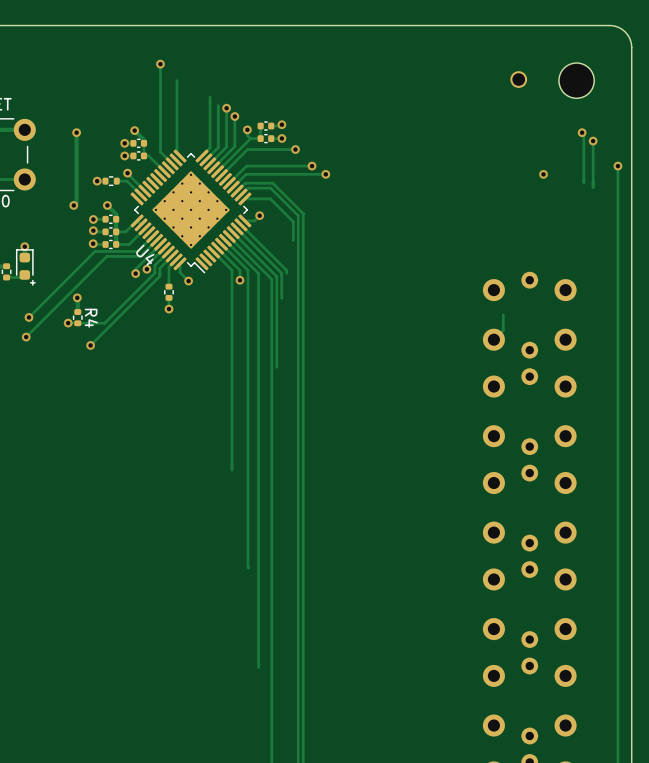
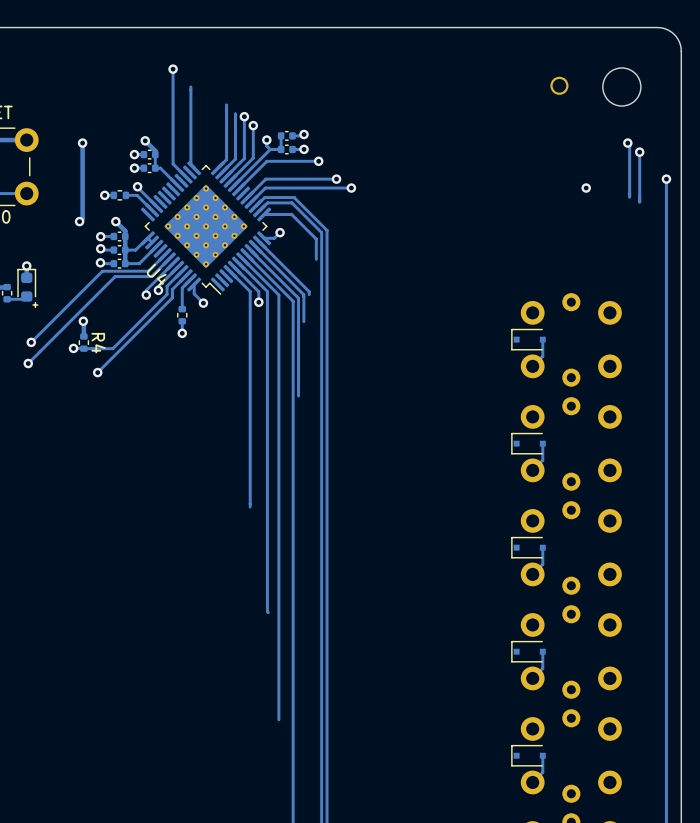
part: none -> (528, 339)
part: none -> (528, 443)
track: none -> (542, 443) (542, 460) (532, 470)
part: none -> (528, 547)
track: none -> (542, 547) (542, 564) (532, 574)
part: none -> (528, 651)
track: none -> (542, 651) (542, 668) (532, 678)
part: none -> (528, 755)
track: none -> (542, 755) (542, 772) (532, 782)

